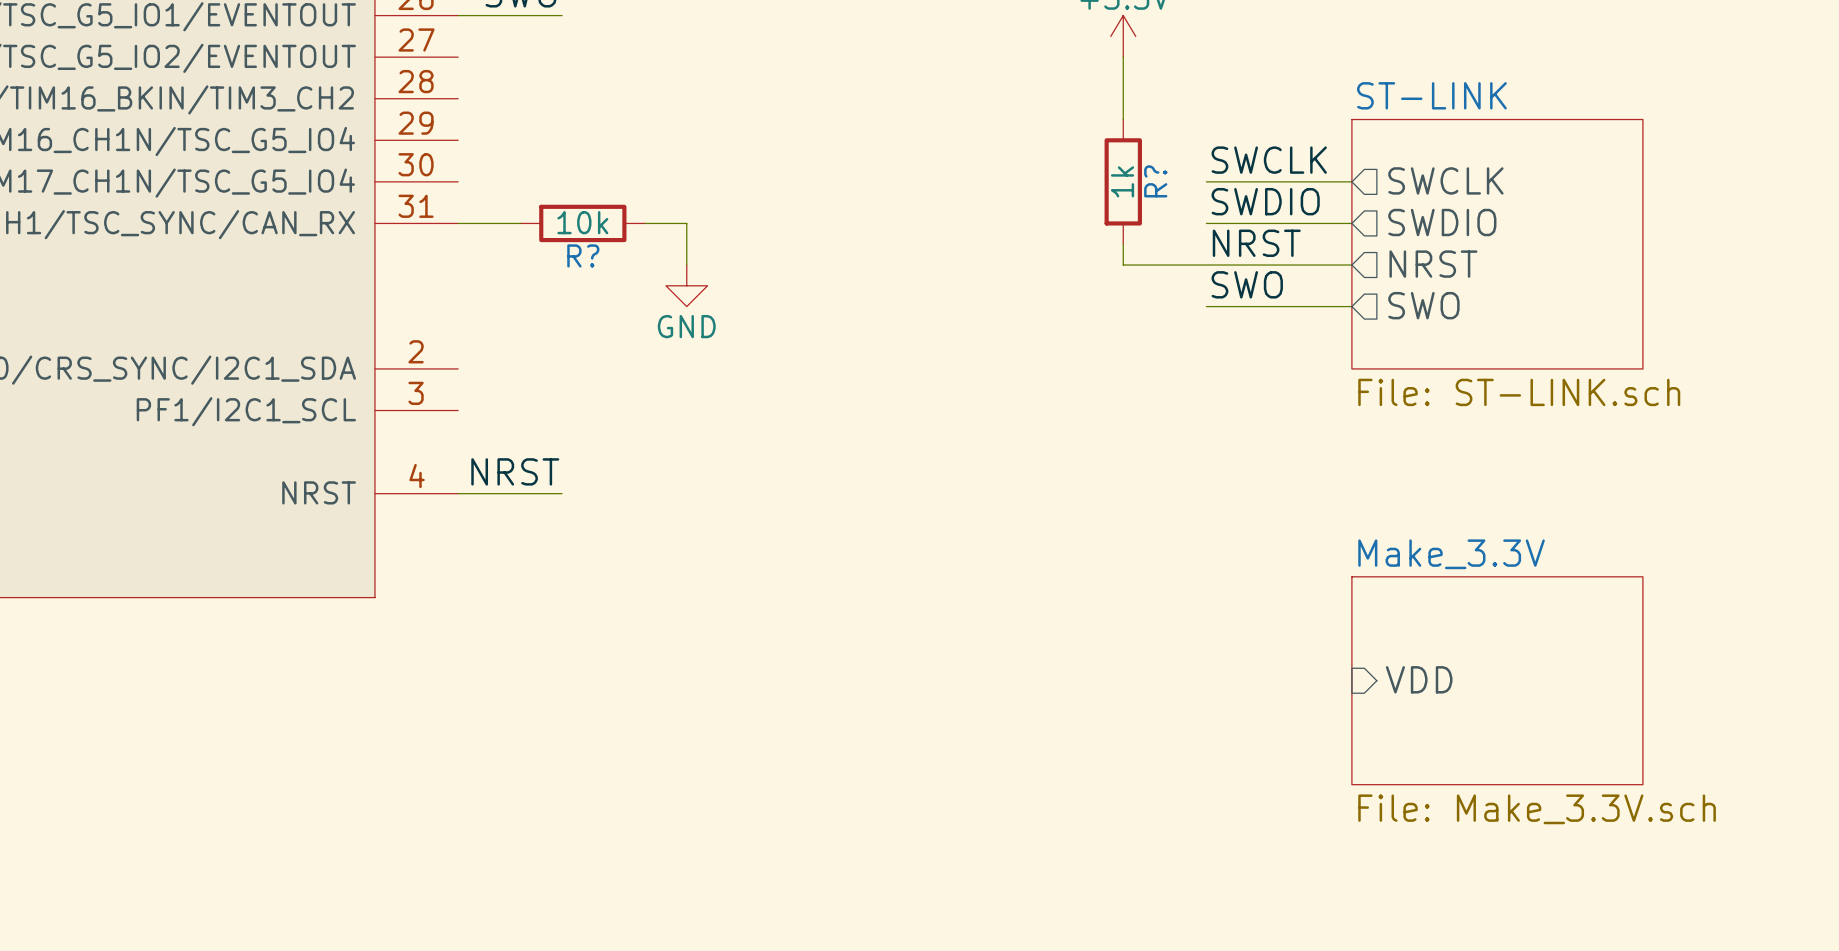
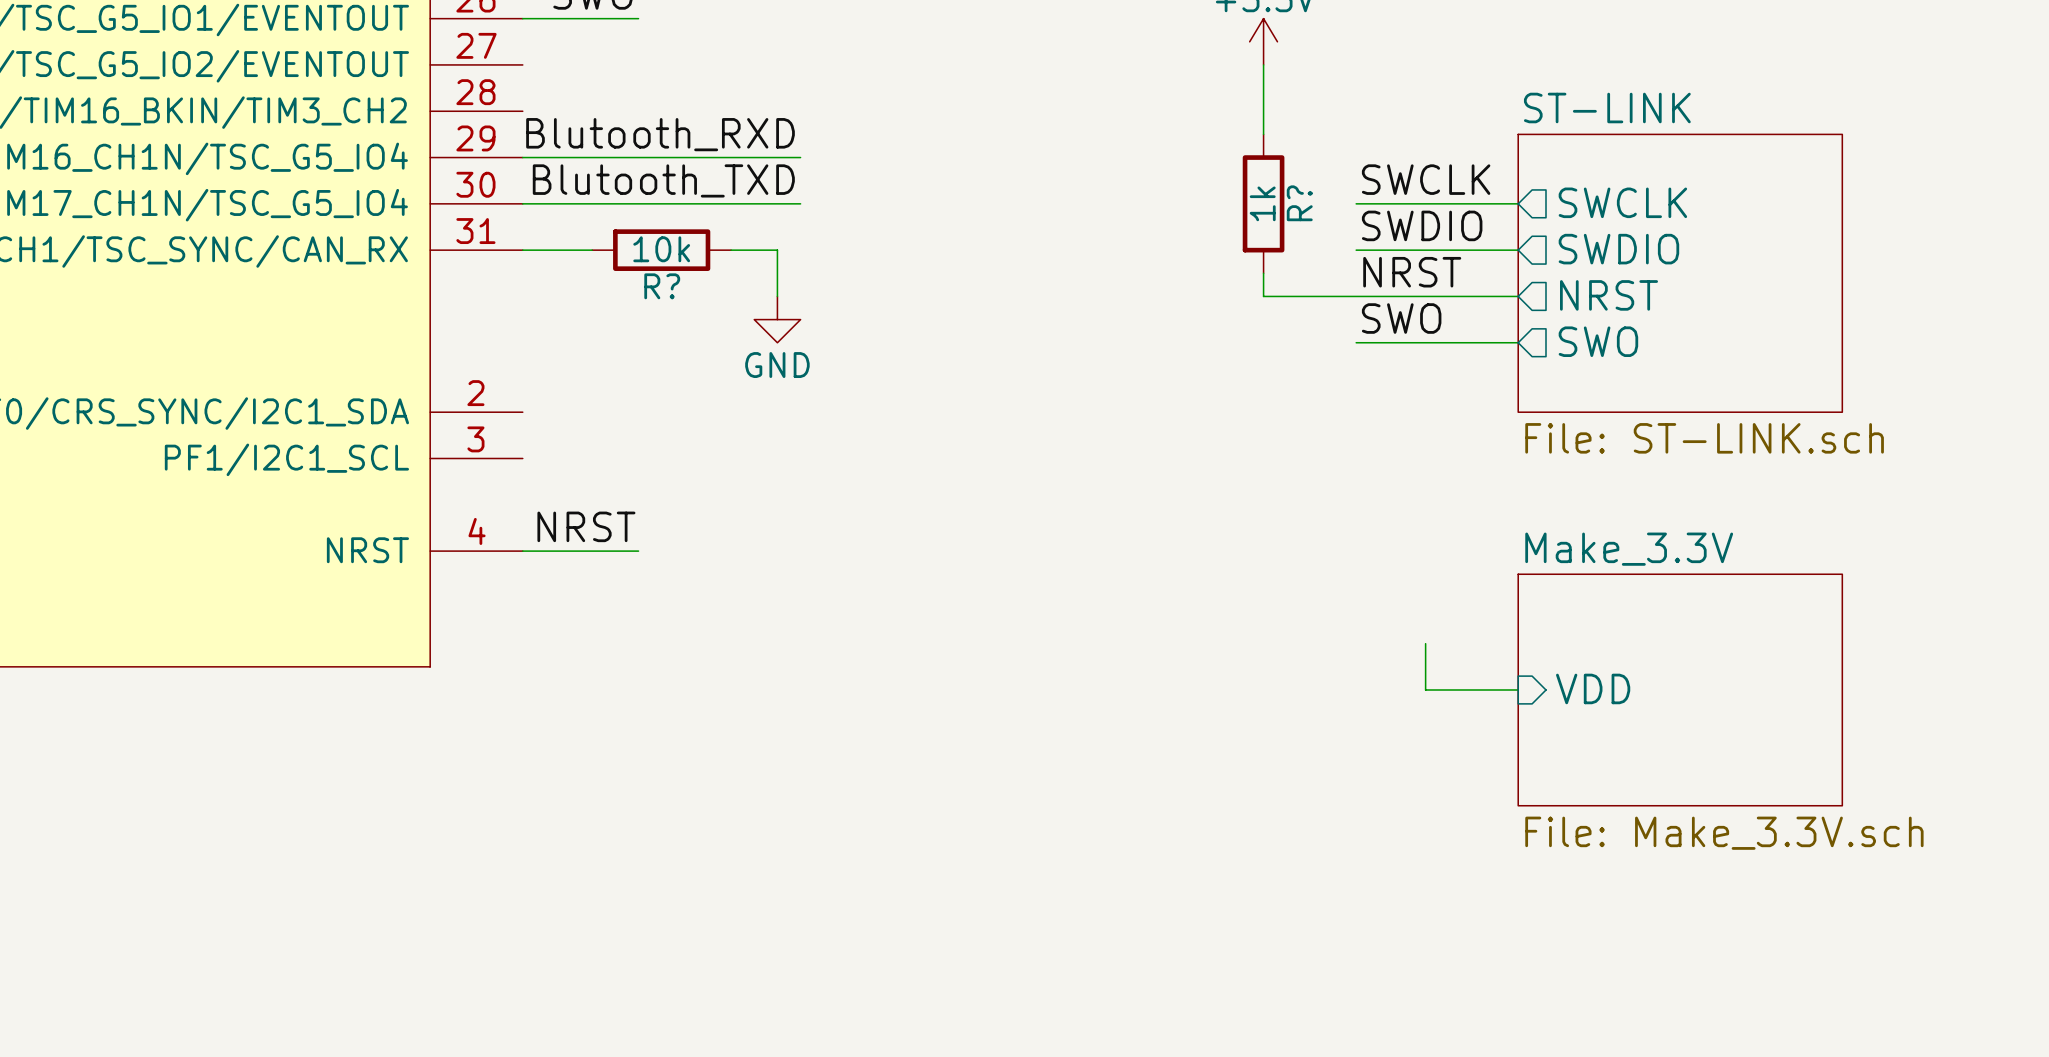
label: none -> Blutooth_RXD (660, 134)
wire: none -> (522, 157) (800, 157)
label: none -> Blutooth_TXD (663, 180)
wire: none -> (522, 203) (800, 203)
wire: none -> (1425, 643) (1425, 689) (1518, 689)
sheet pin position: VDD (1419, 679) -> VDD (1593, 688)
sheet Make_3.3V position: (1497, 680) -> (1680, 689)

